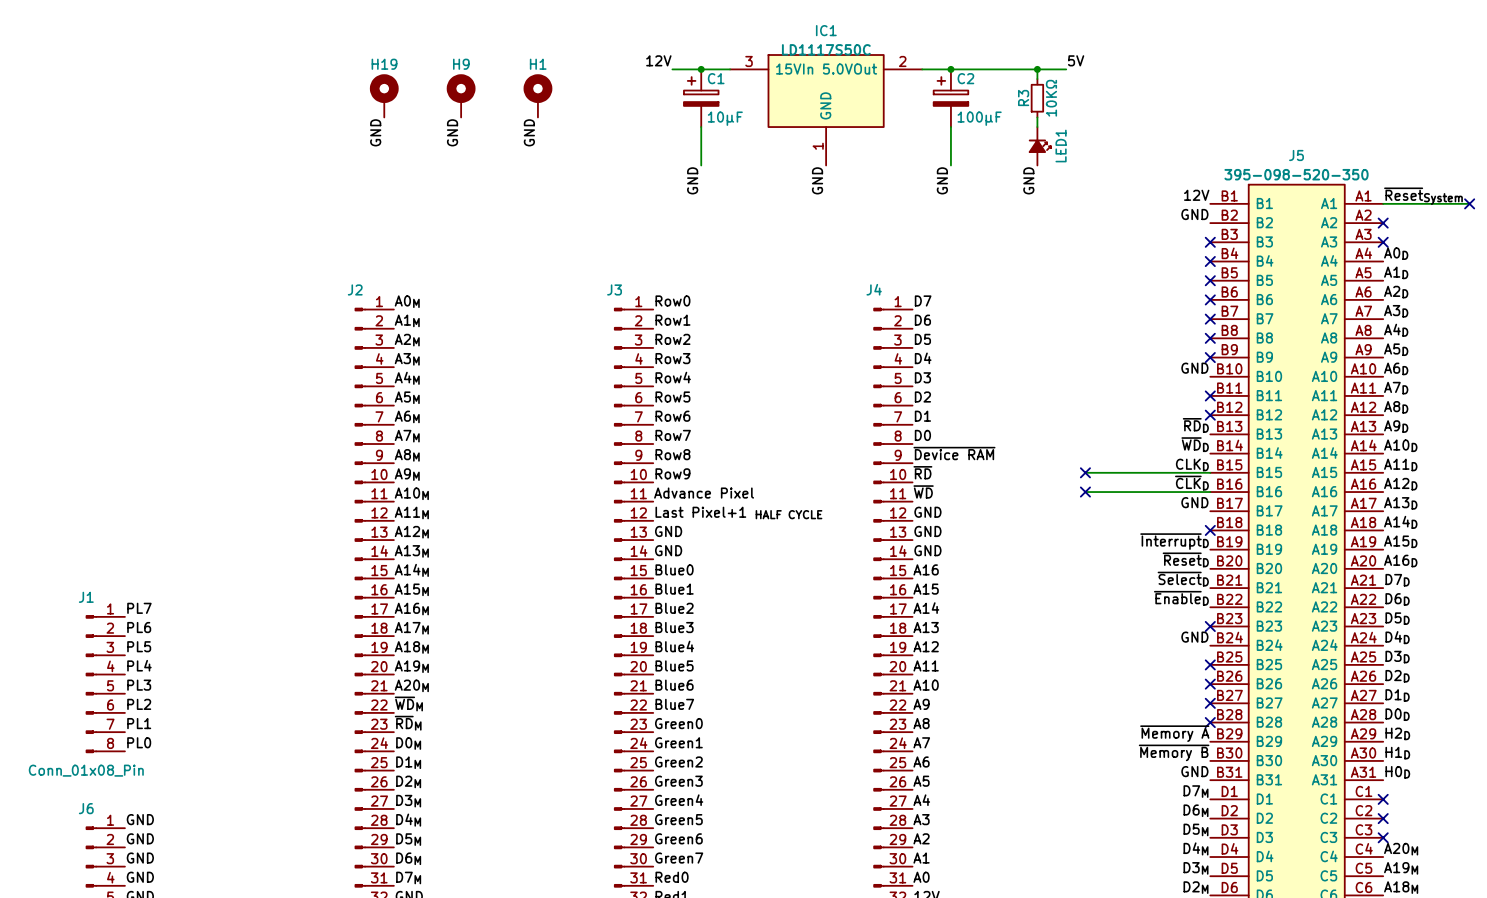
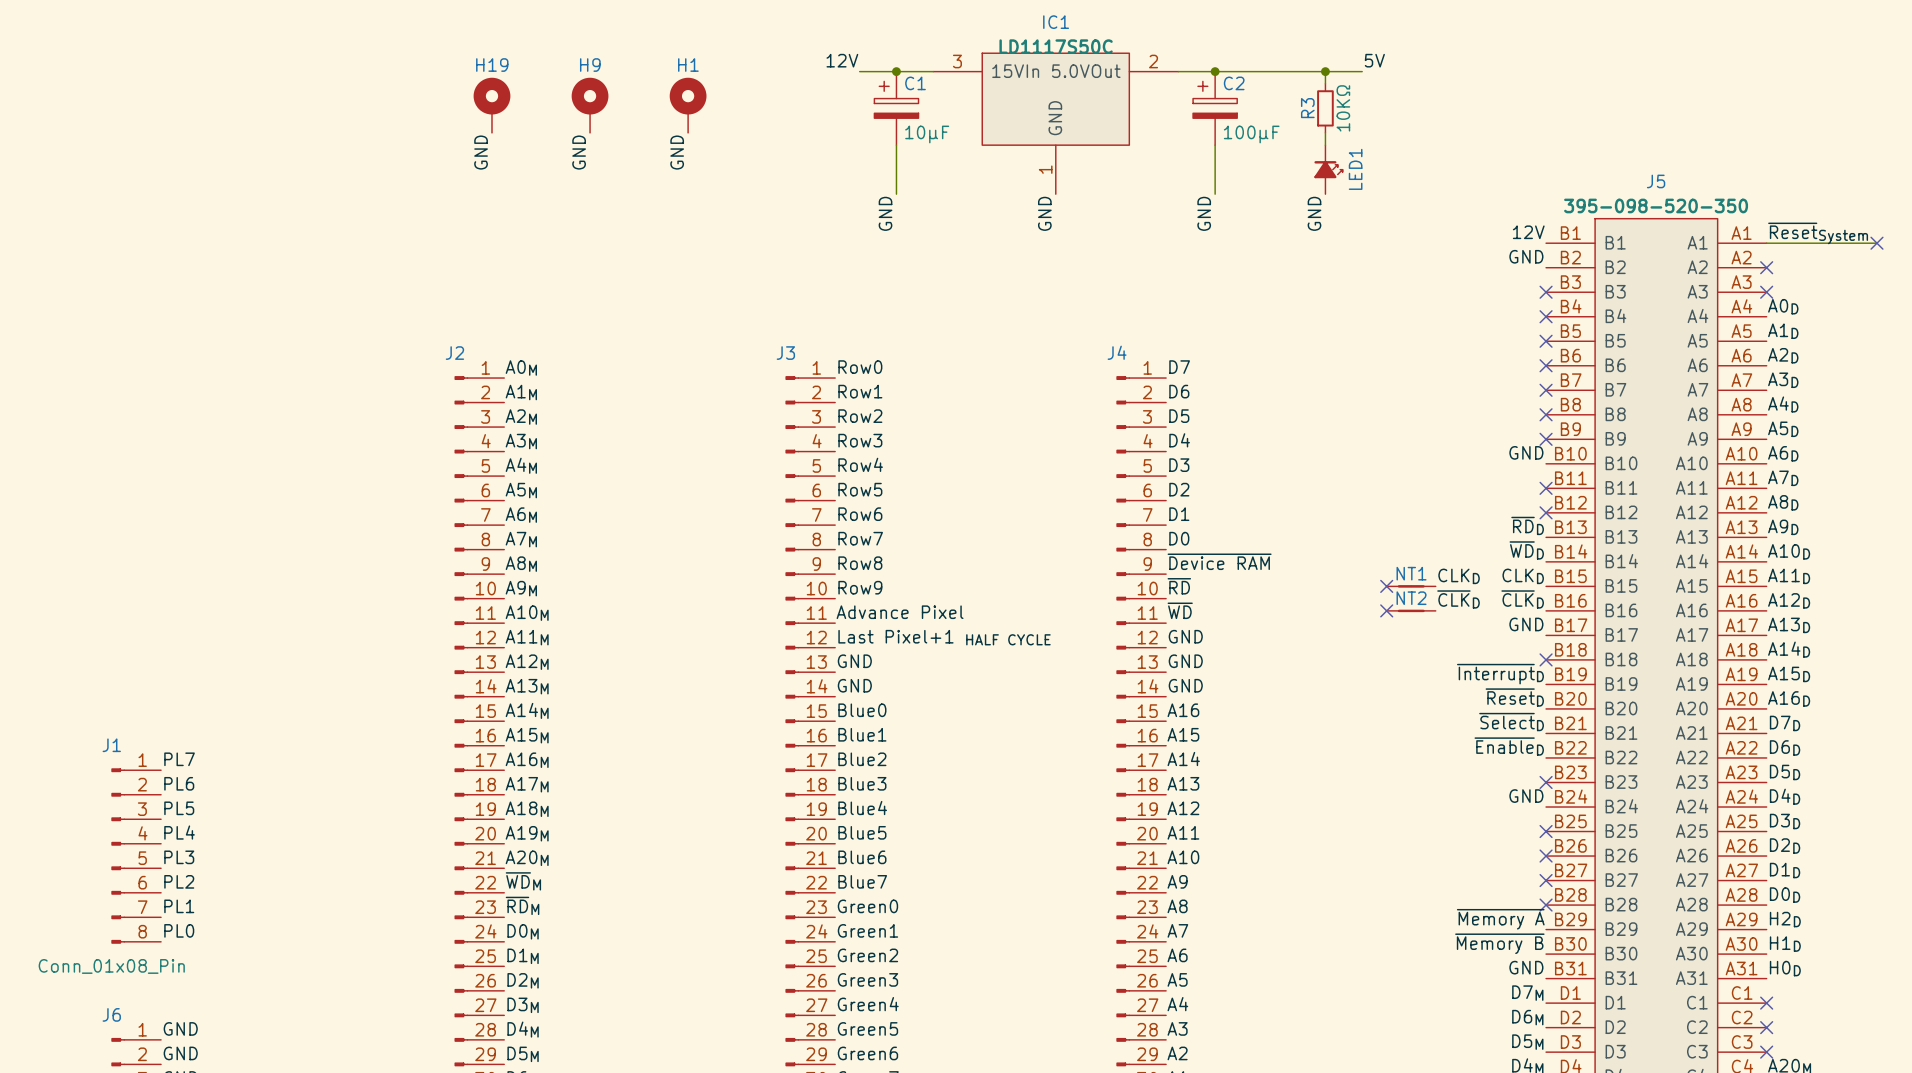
label: none -> CLKD (1459, 576)
wire: (1085, 472) (1210, 472) -> none
NT1: none -> (1411, 586)
label: none -> ~{CLK}D (1458, 599)
wire: (1085, 492) (1210, 492) -> none
NT2: none -> (1411, 610)

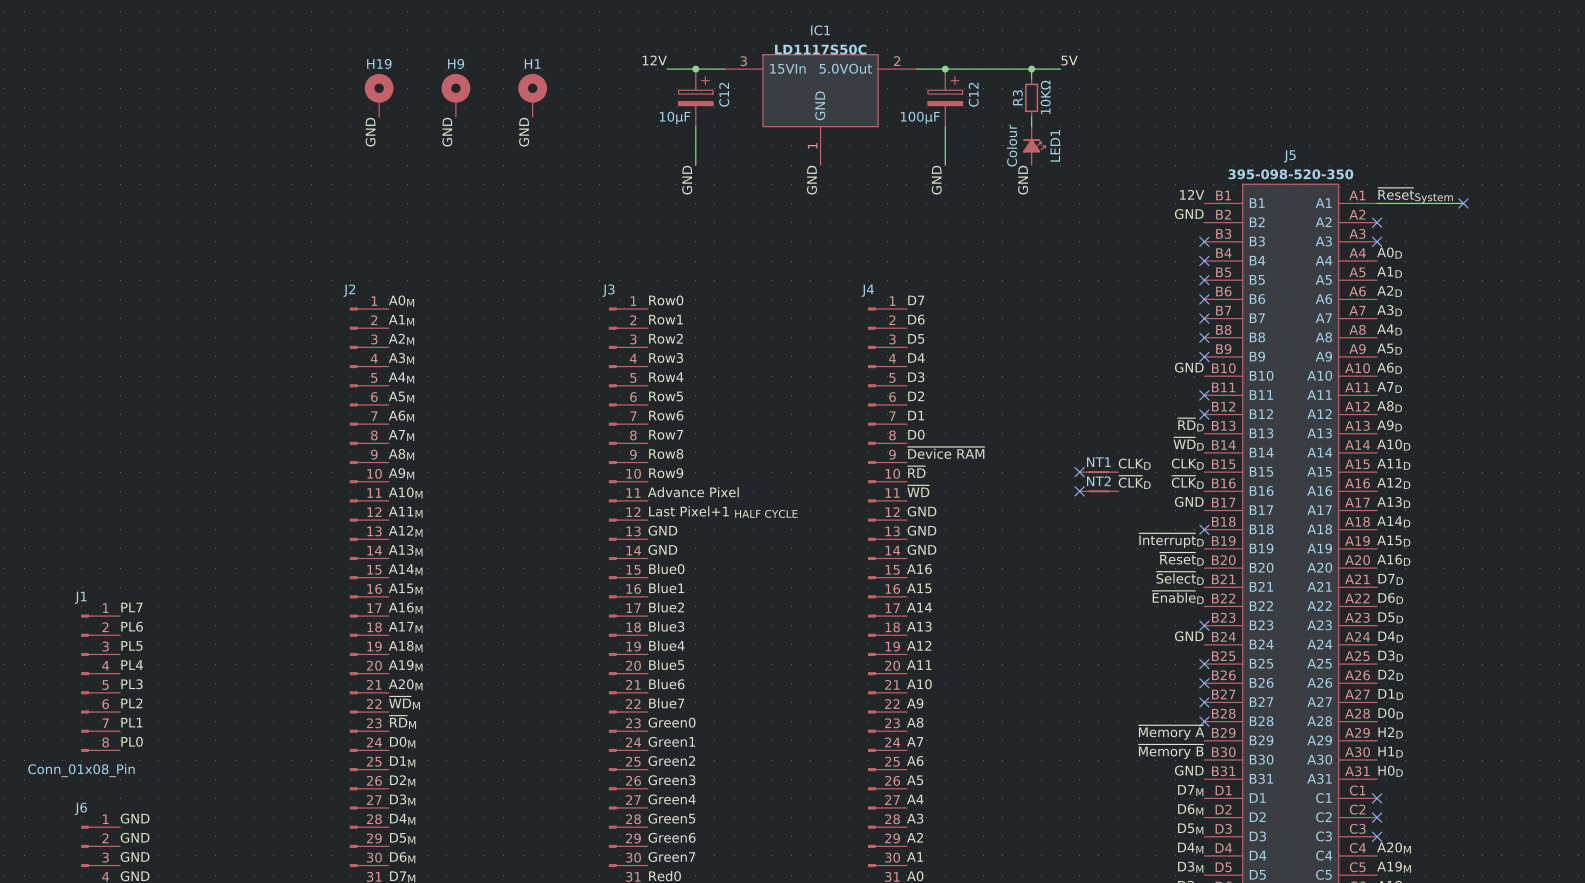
C1: 10μF (896, 108) -> none
C12: none -> (695, 97)
C2: 100μF (1215, 108) -> none
C12: none -> (945, 97)
LED1 text: none -> Colour (1011, 145)

